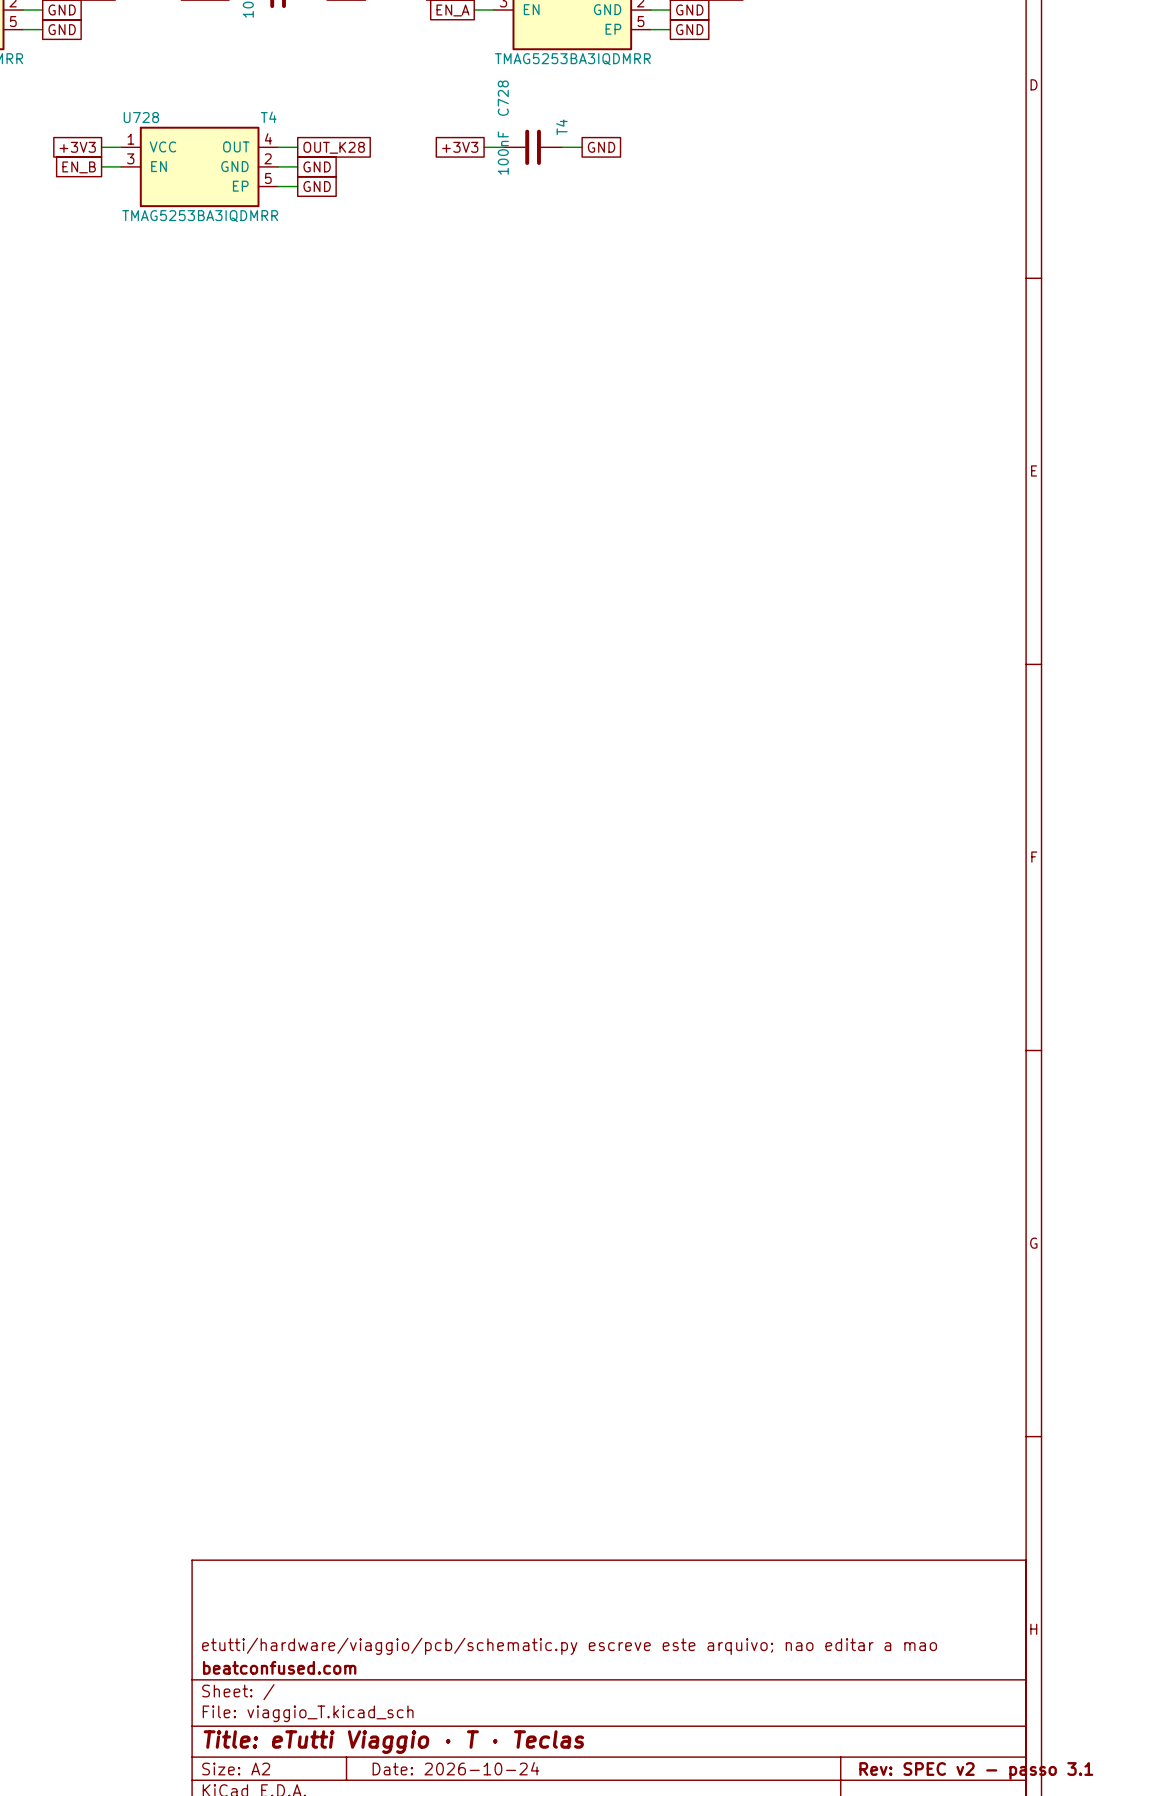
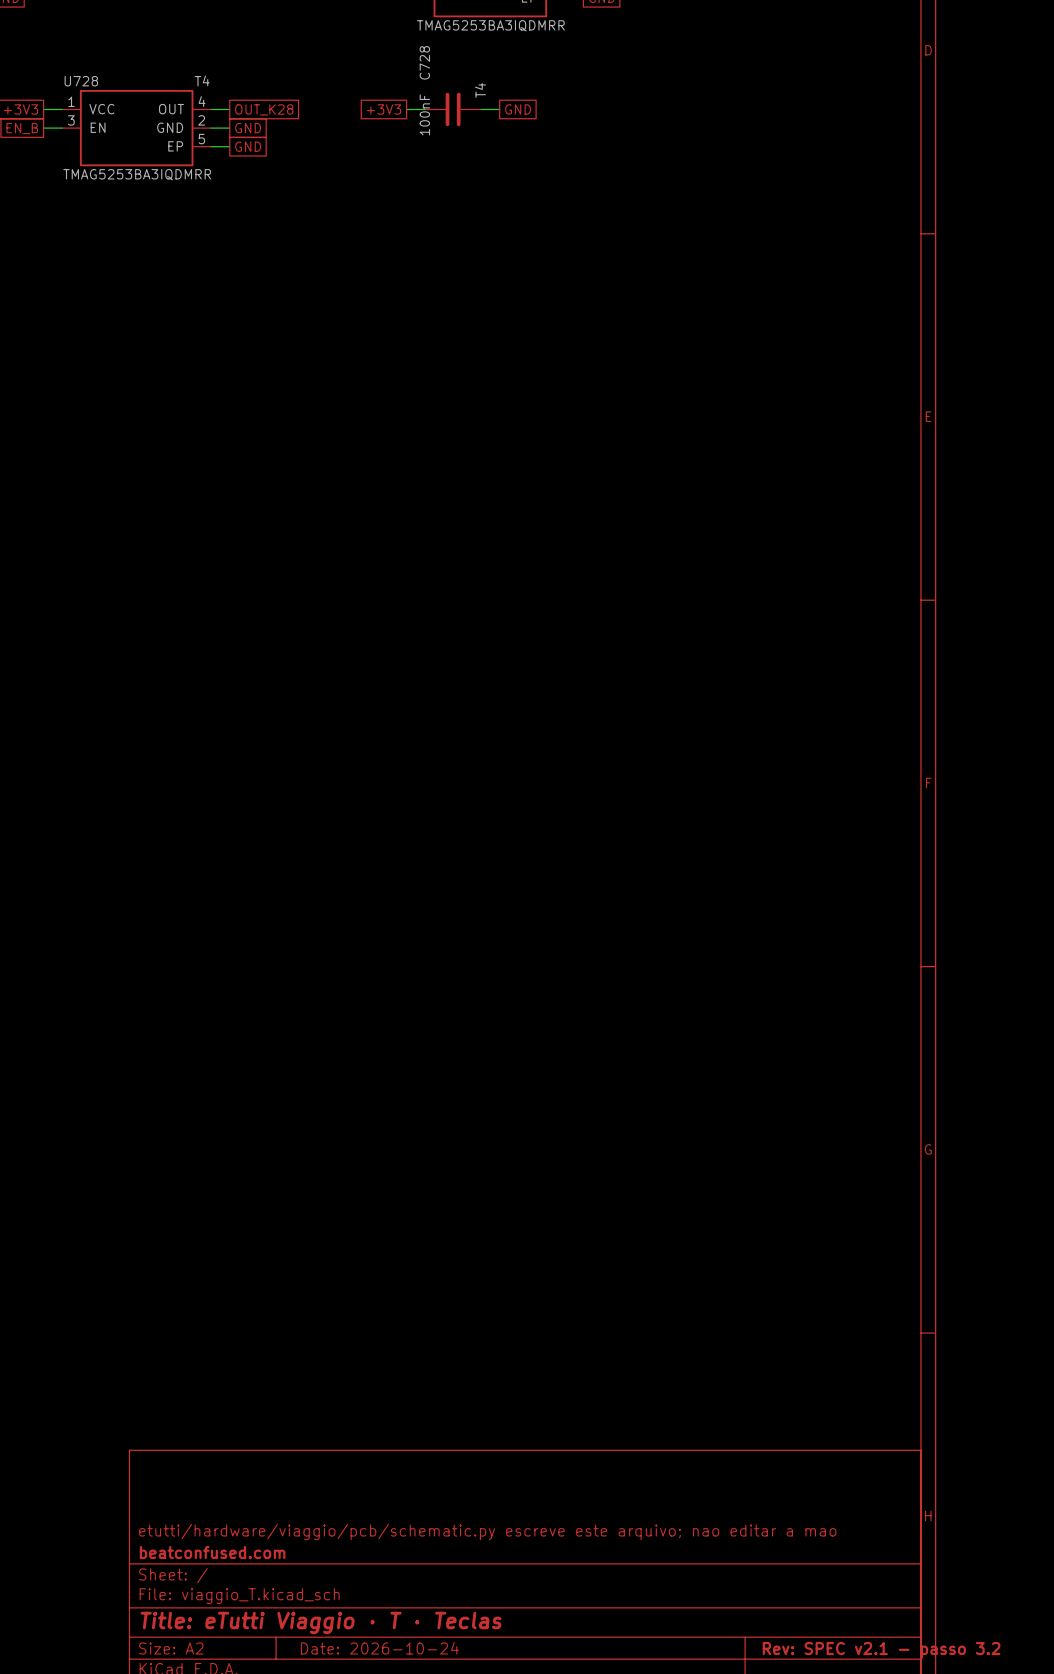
title block: Rev: SPEC v2 - passo 3.1 (976, 1770) -> Rev: SPEC v2.1 - passo 3.2 (881, 1650)

